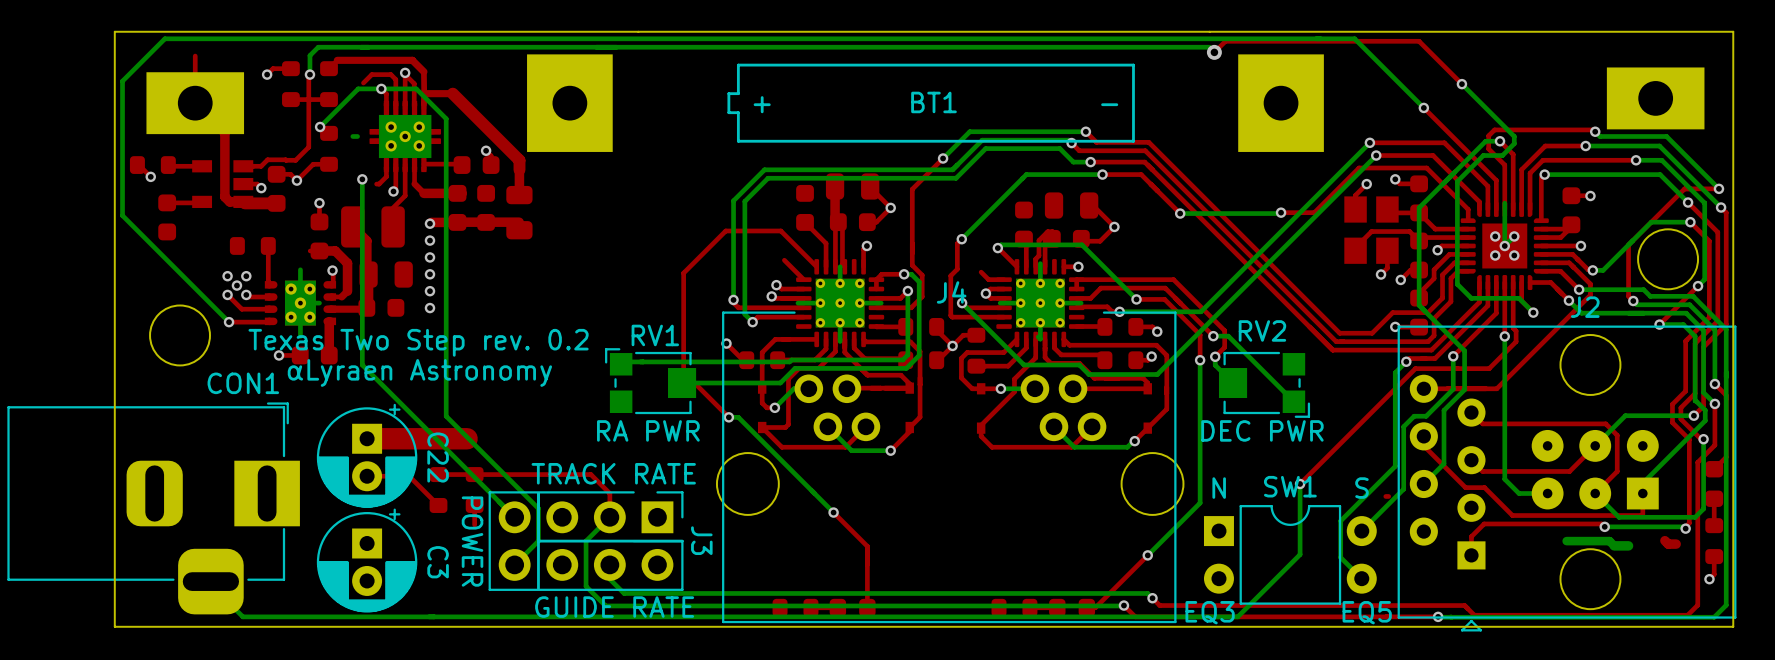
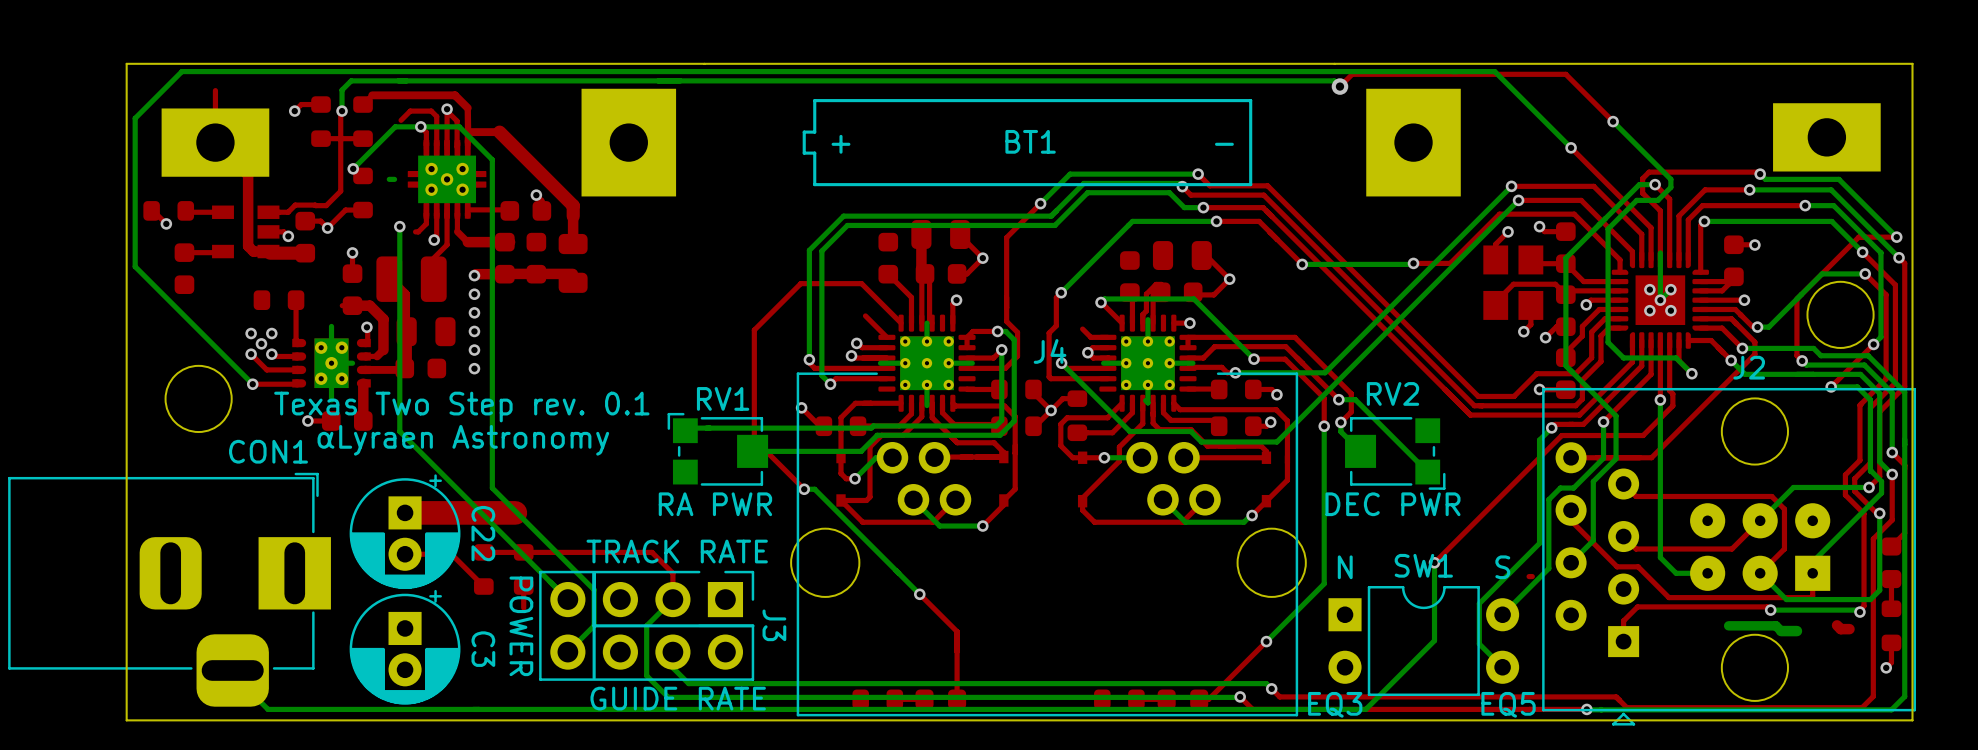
text: Texas Two Step rev. 0.2 (418, 342) -> Texas Two Step rev. 0.1 (461, 407)

